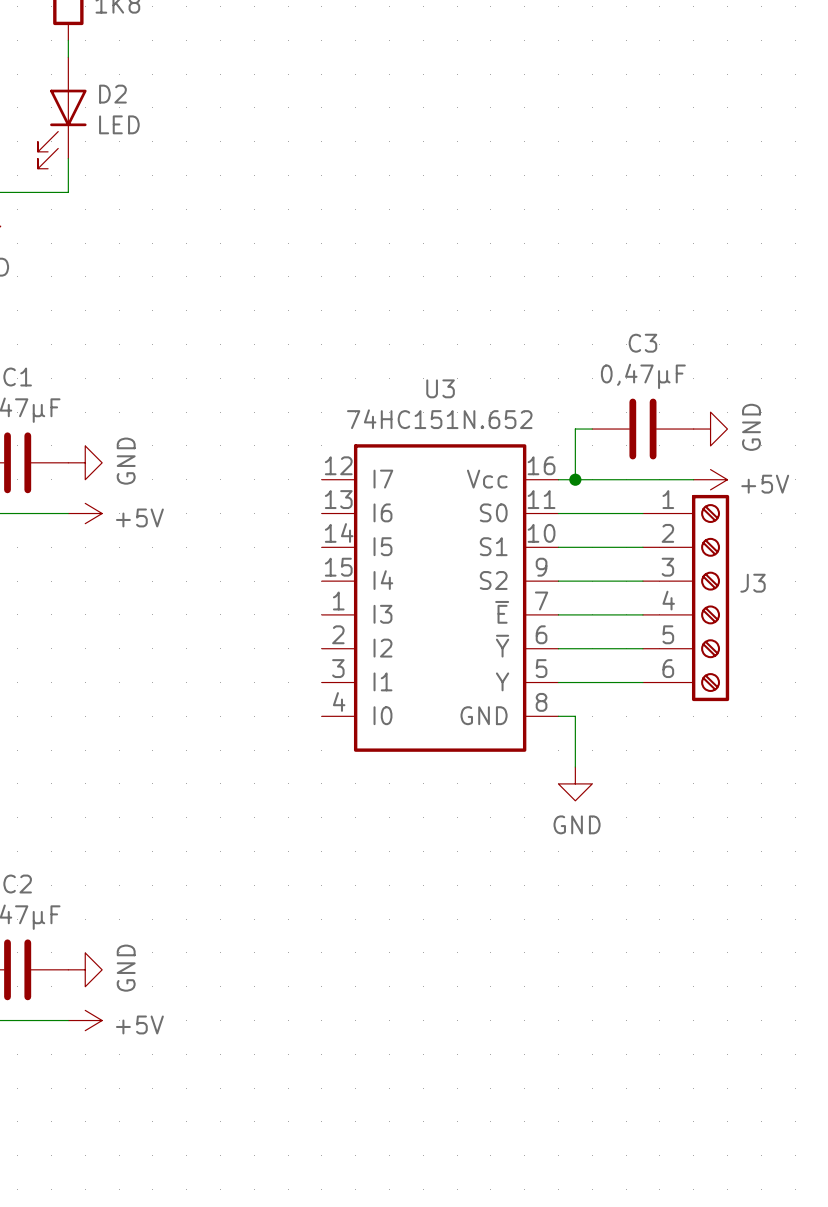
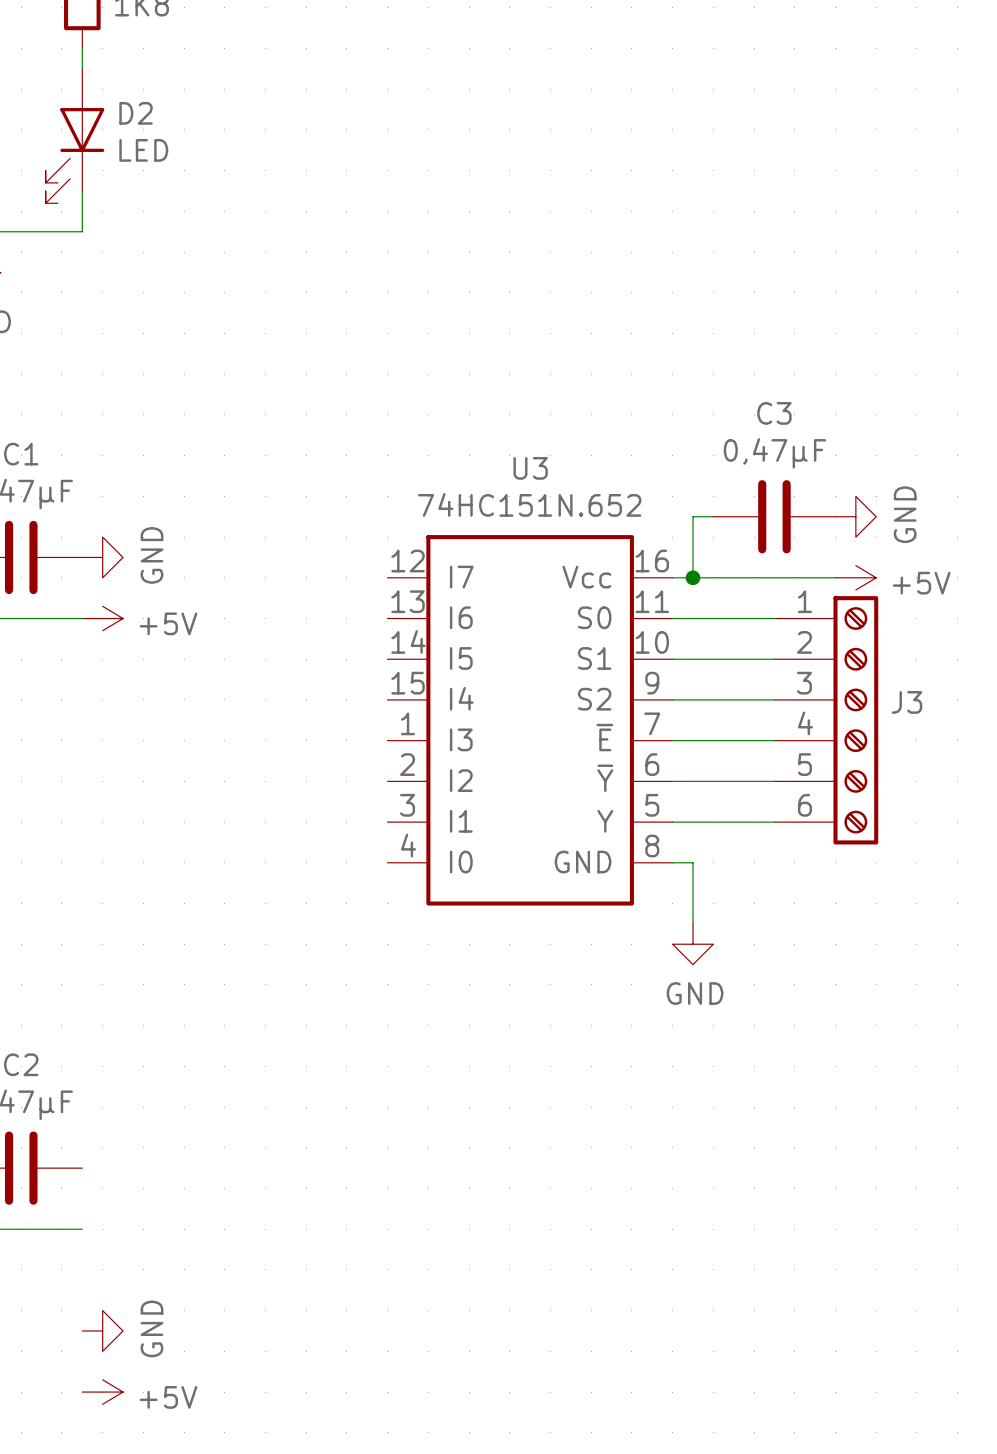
power symbol: GND (85, 969) -> none
power symbol position: +5V (85, 1020) -> +5V (102, 1392)
power symbol: none -> GND (102, 1330)

